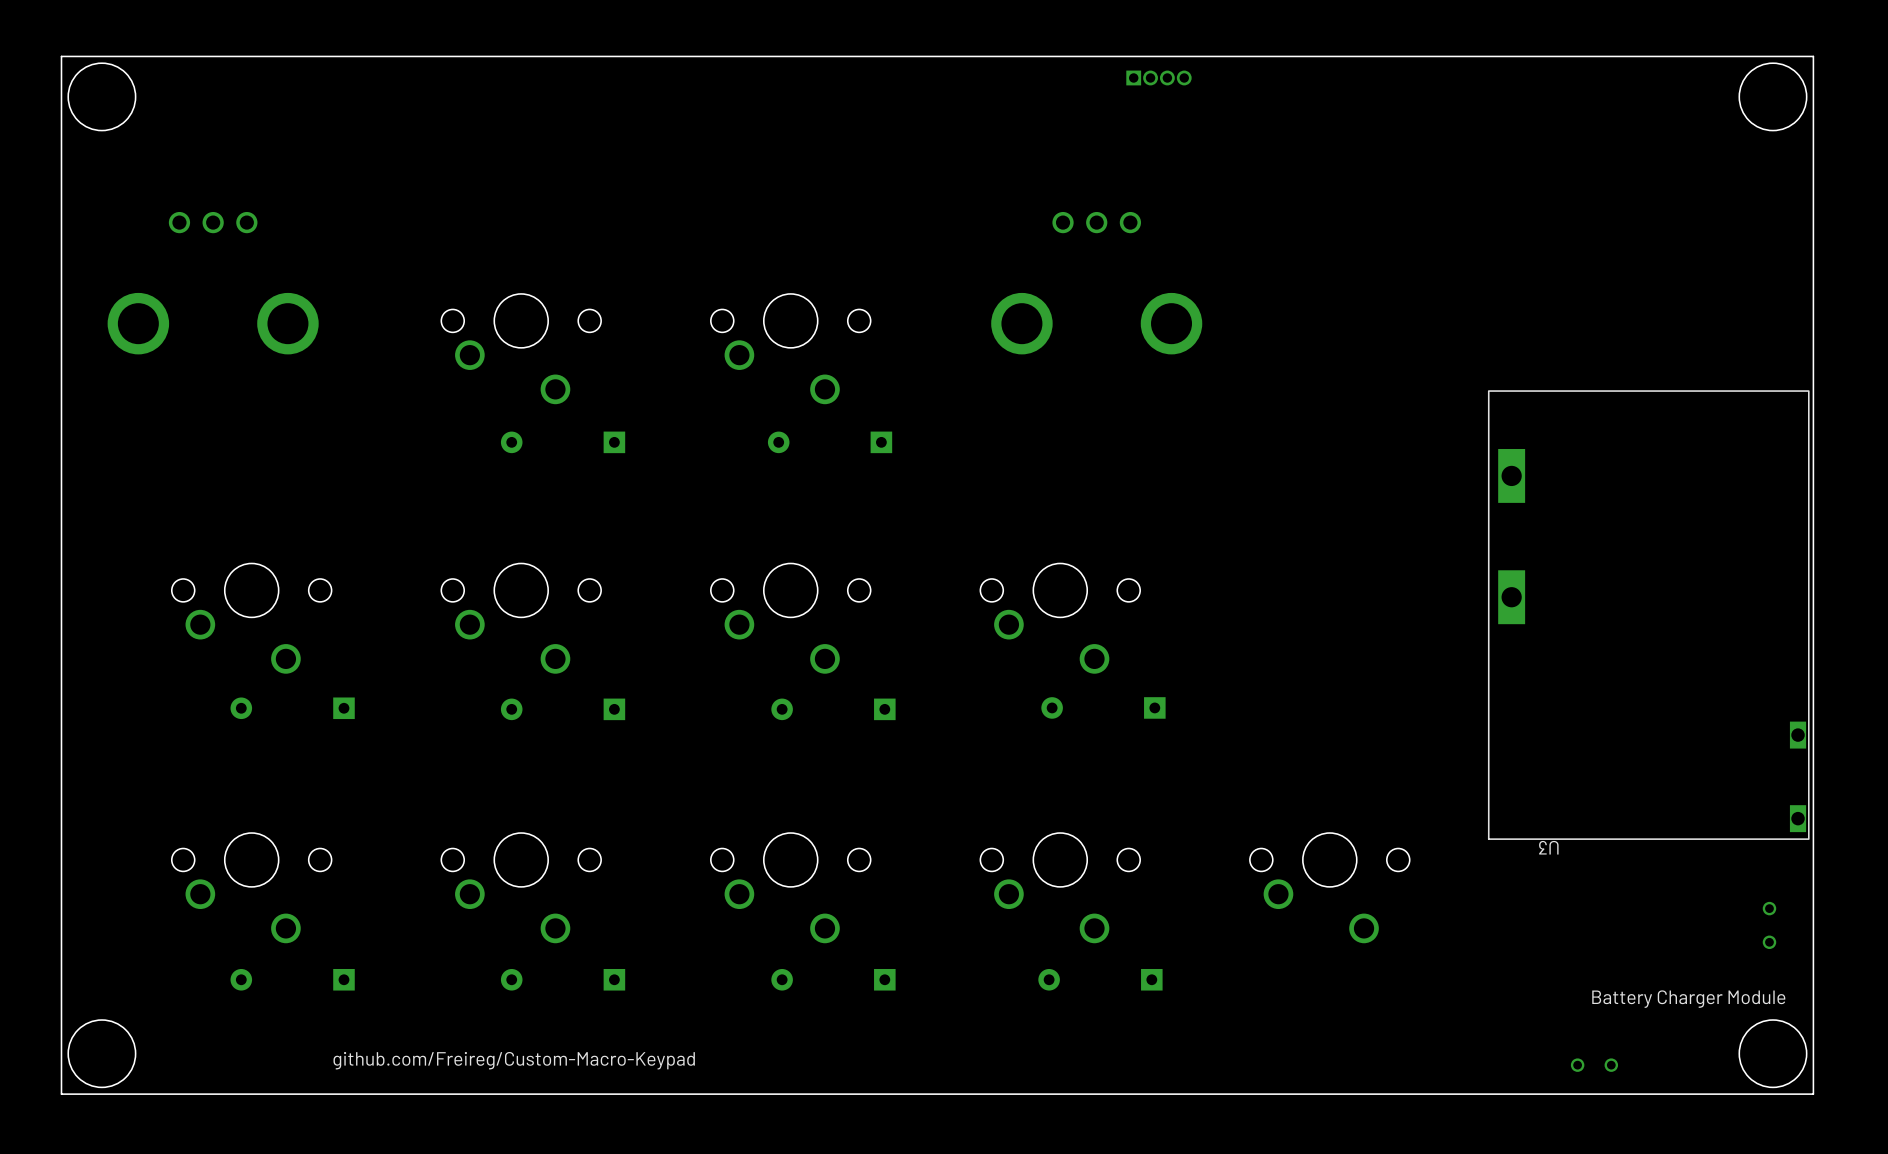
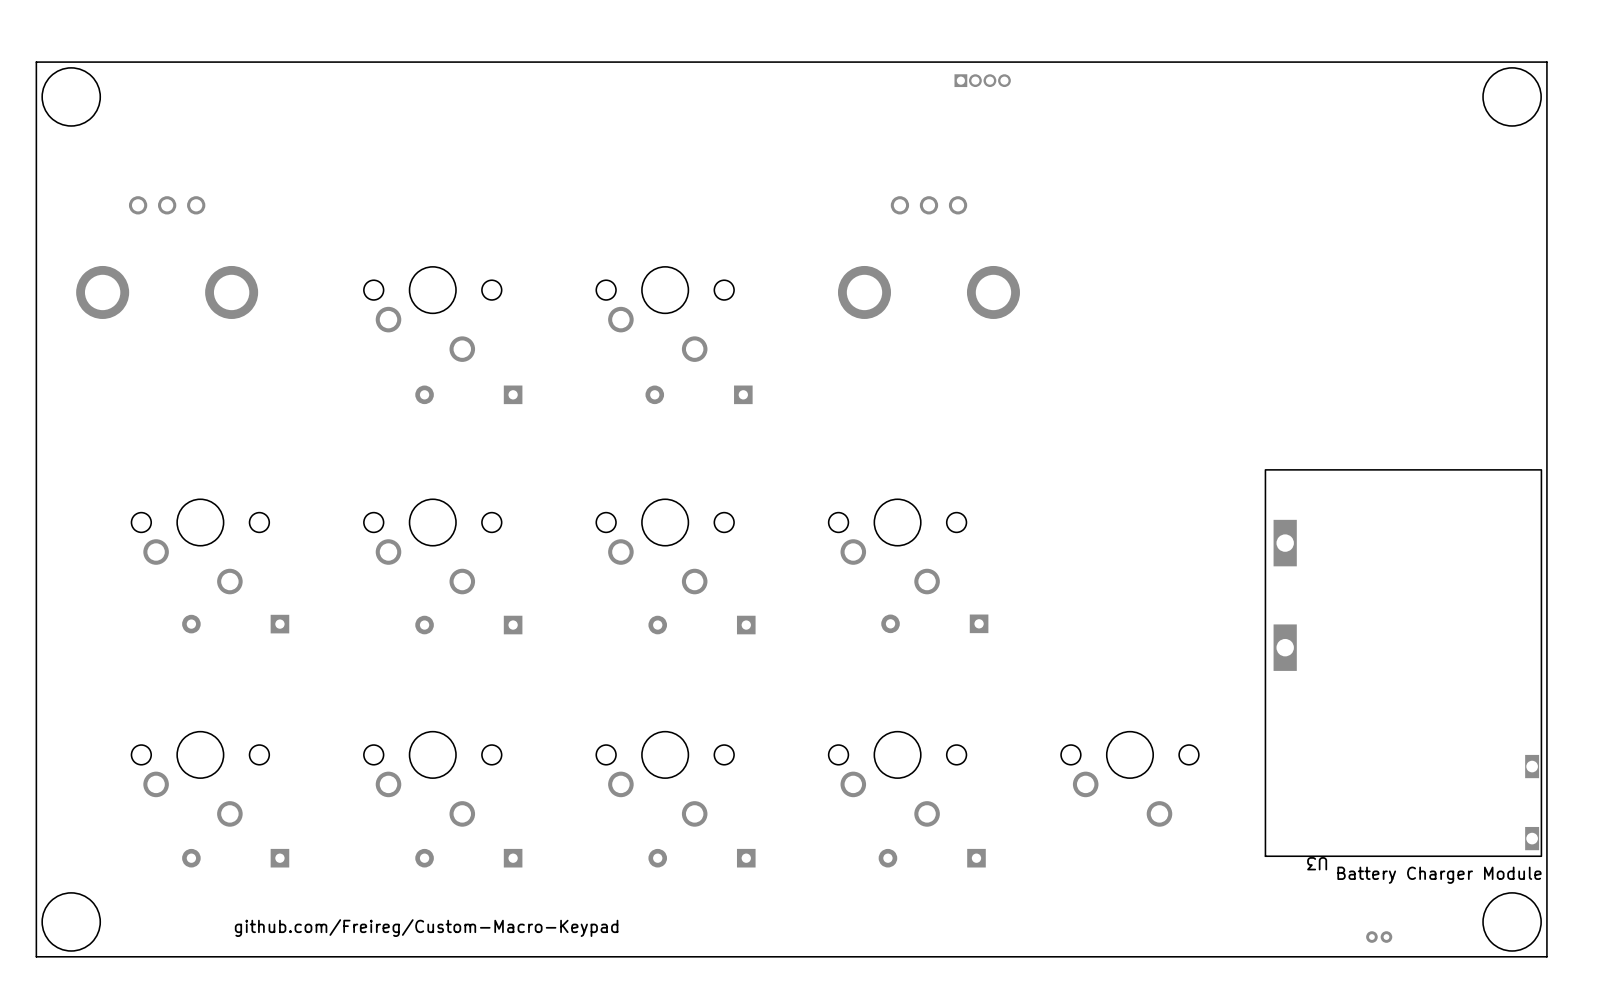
U3 position: (1648, 615) -> (1403, 663)
part: (1769, 925) -> none
part: (1594, 1065) -> none
part: none -> (1379, 937)

